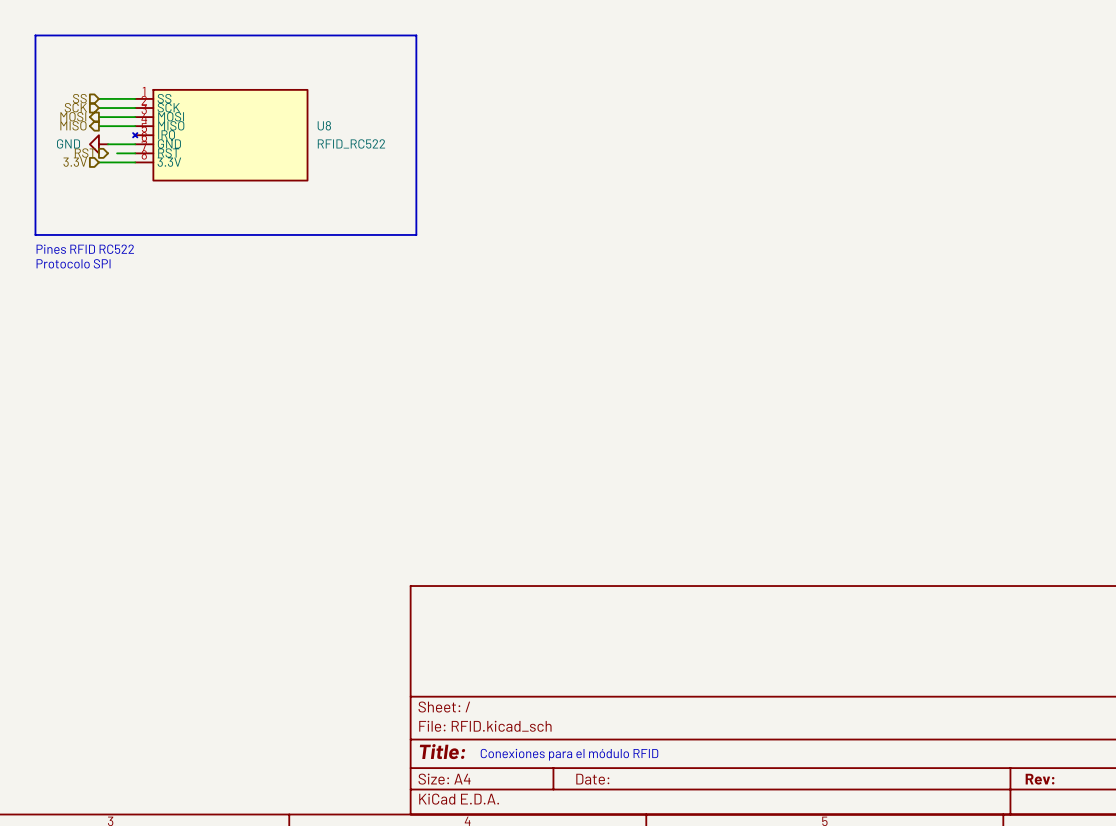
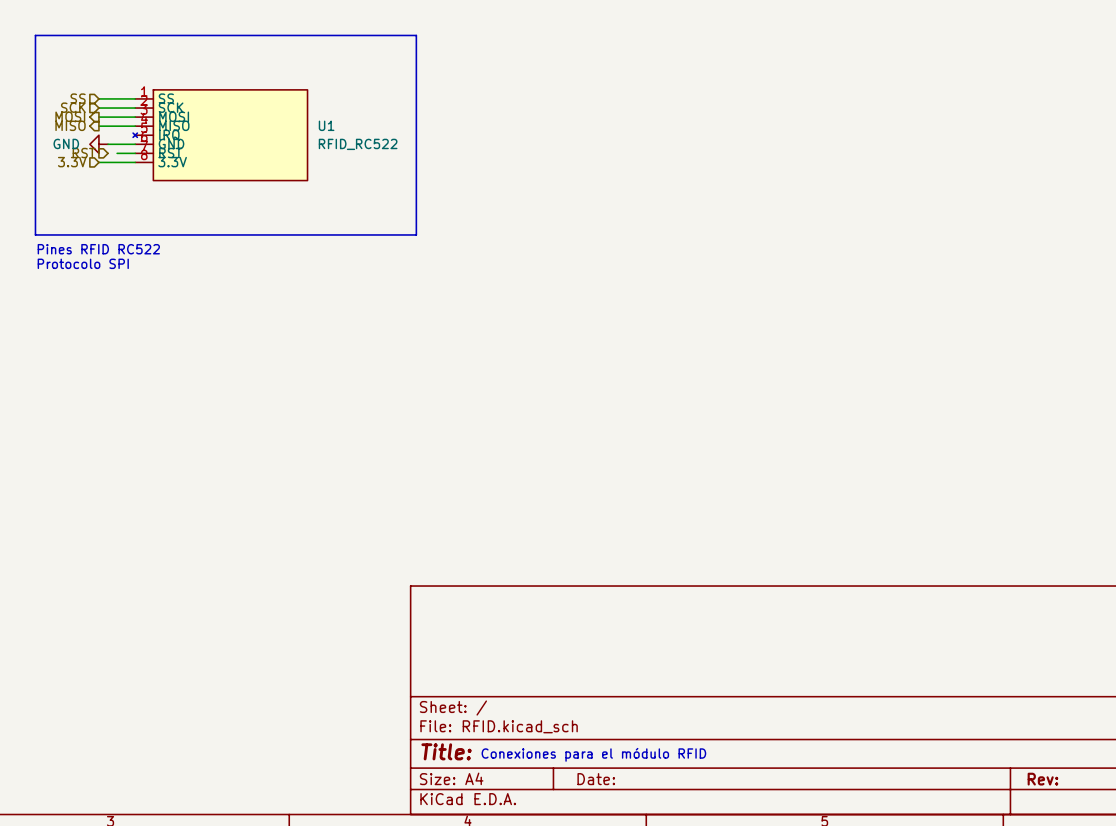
U8 name: U8 (324, 125) -> U1 (326, 125)

